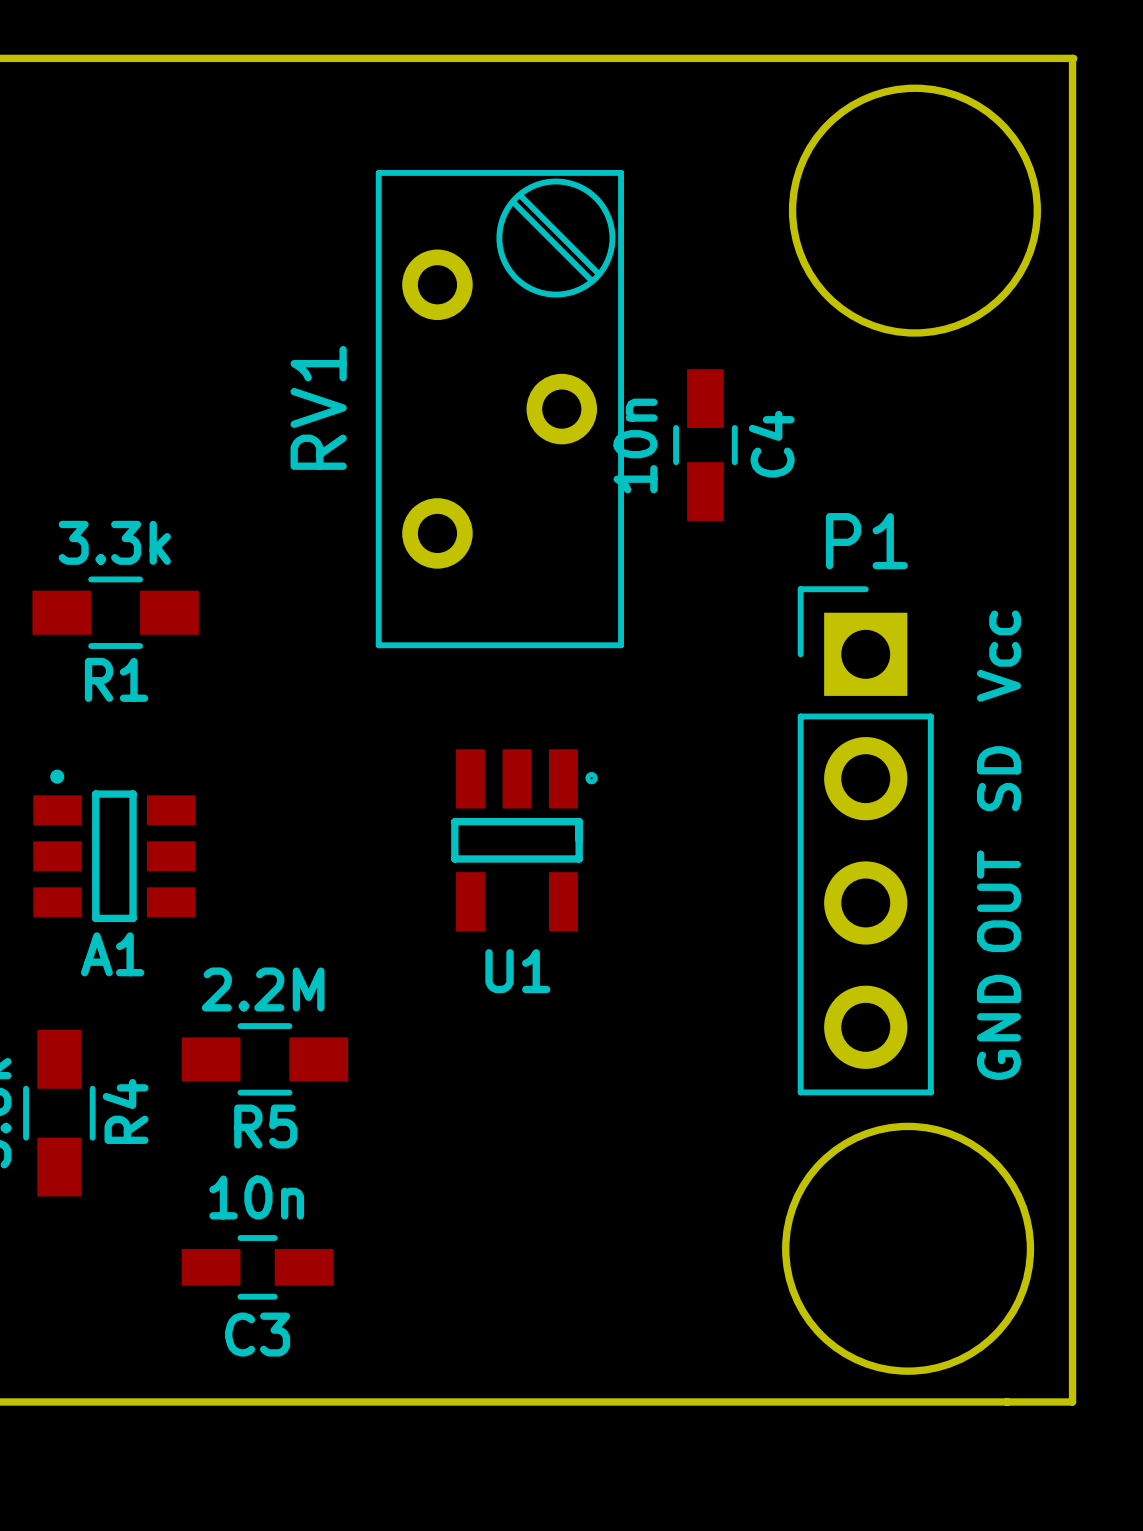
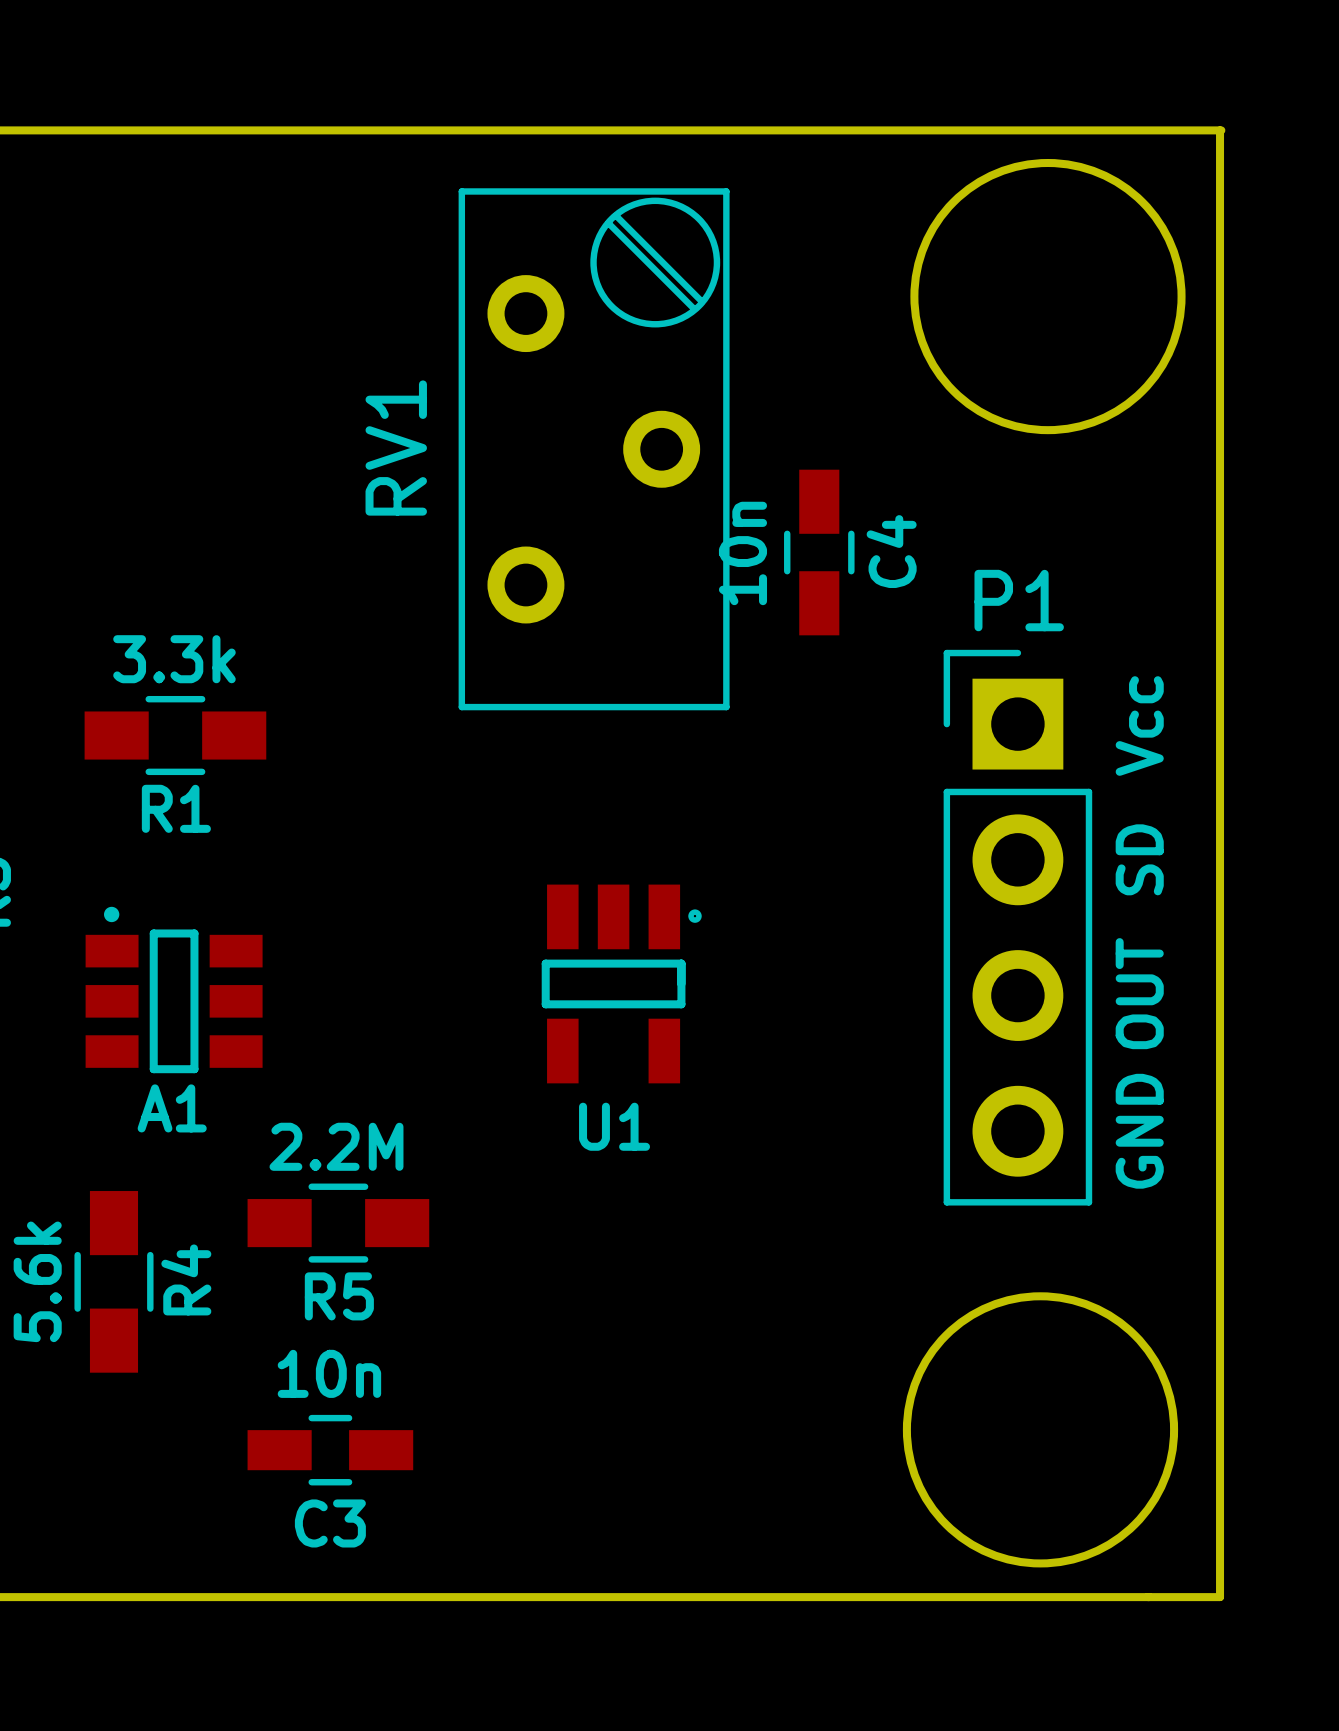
RV1 position: (499, 409) -> (594, 449)
text position: Vcc (998, 656) -> Vcc (1139, 726)
text position: SD (998, 778) -> SD (1139, 859)
P1 position: (865, 840) -> (1017, 927)
text position: OUT (998, 901) -> OUT (1139, 993)
text position: GND (998, 1027) -> GND (1139, 1131)

